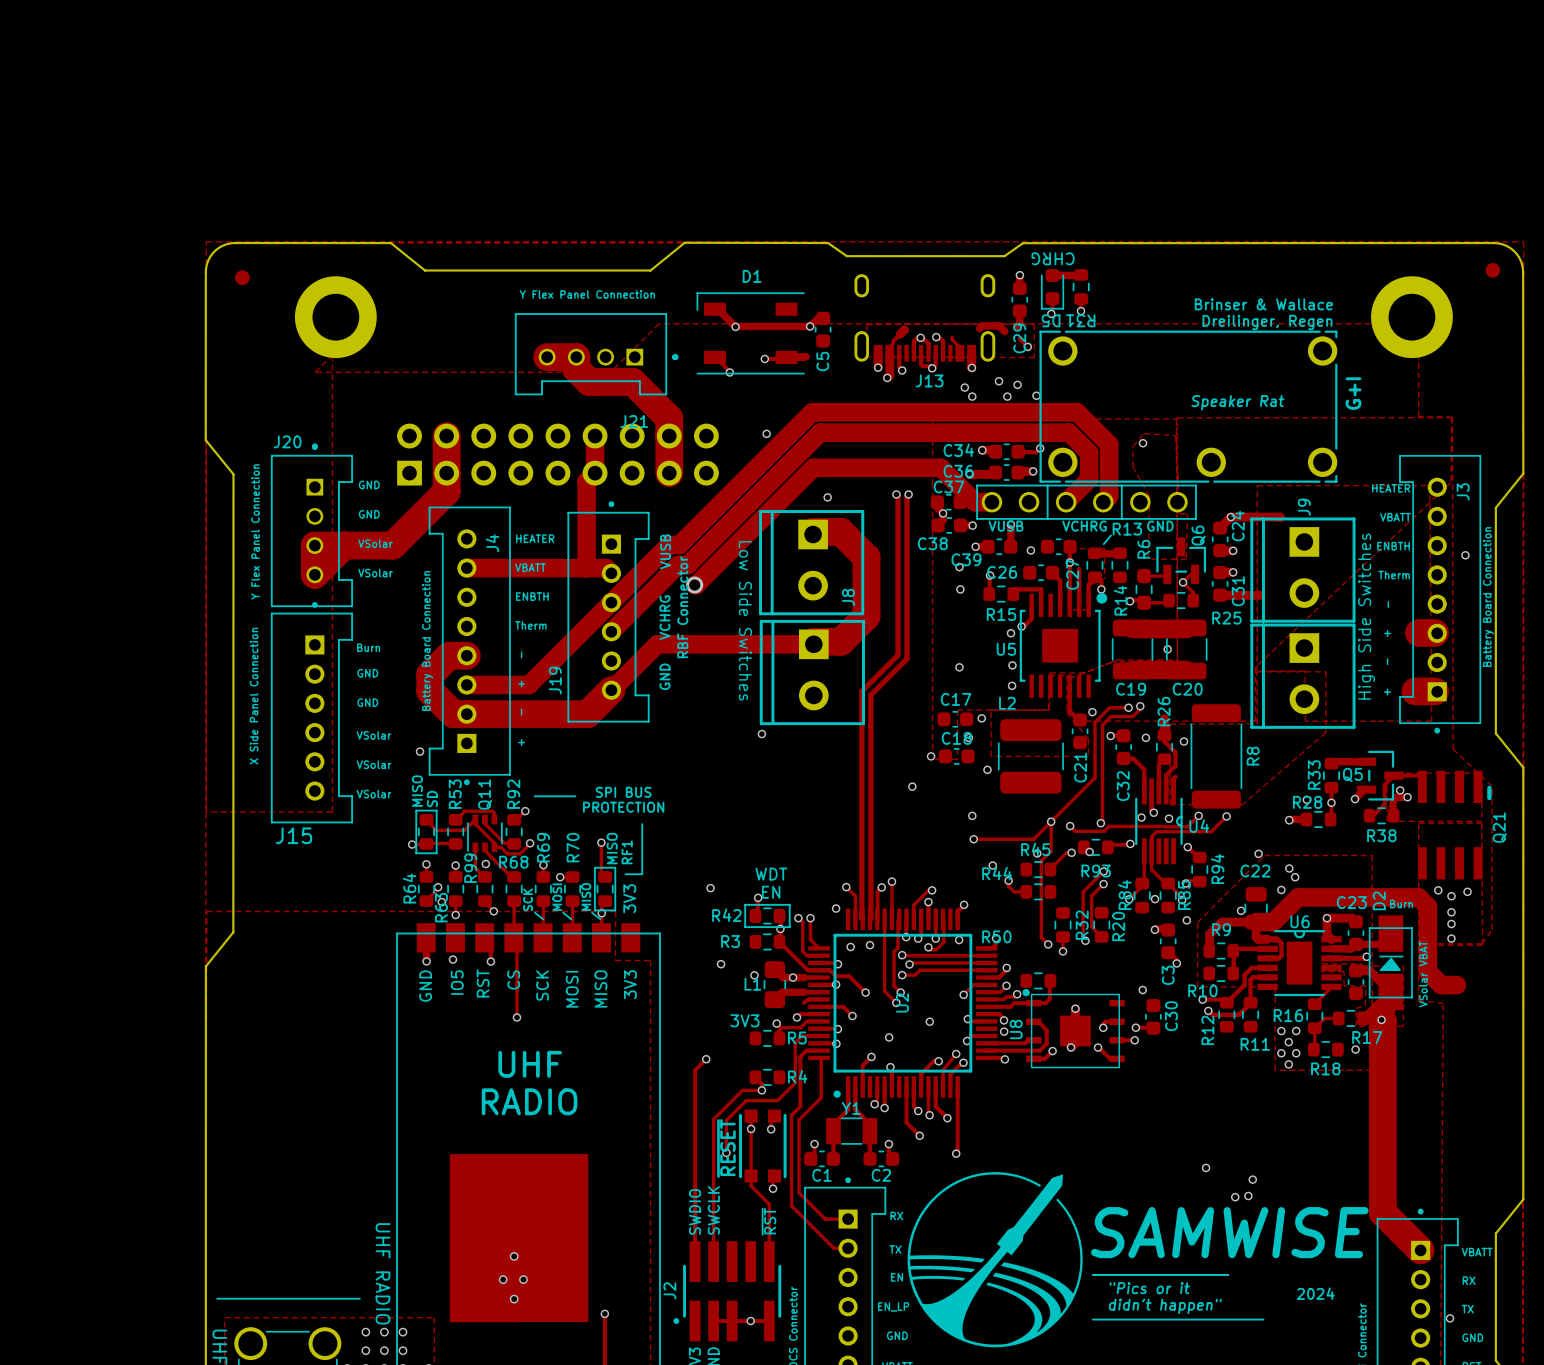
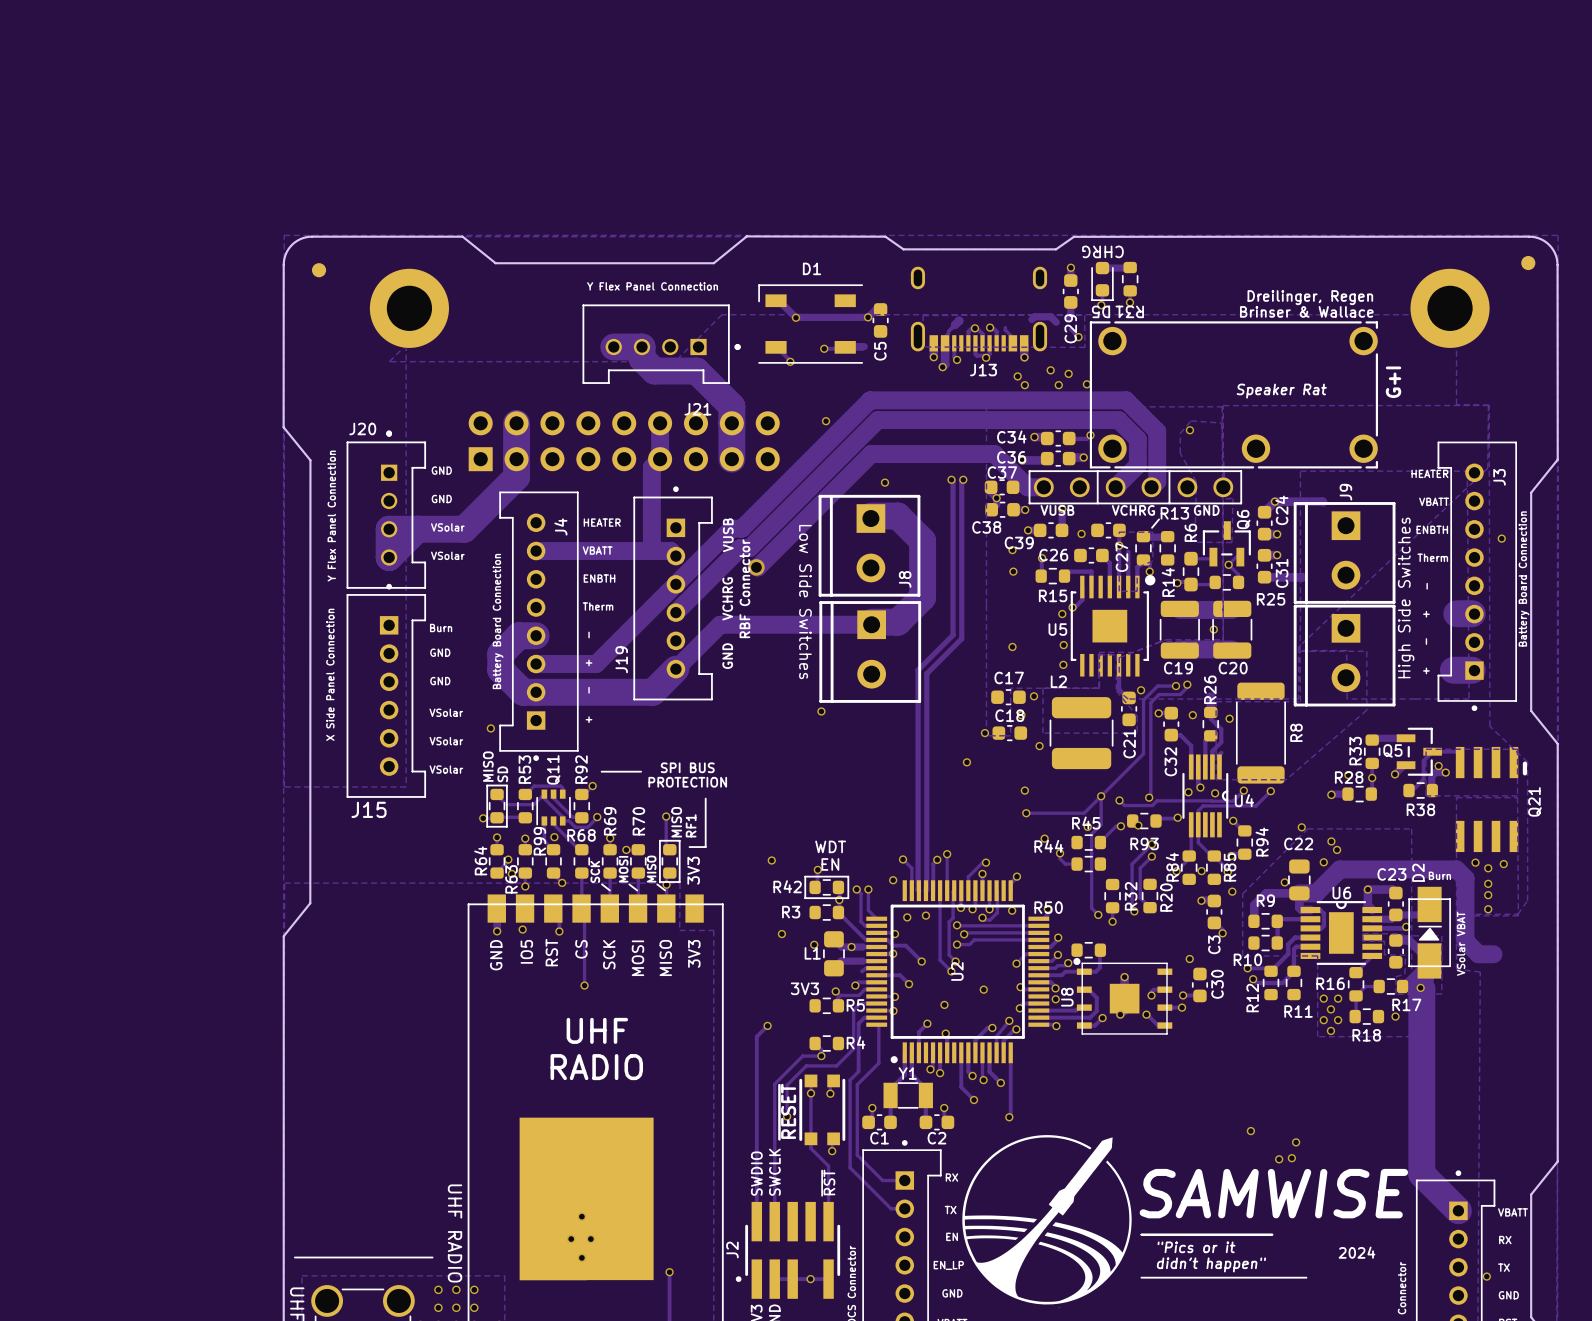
text: Brinser & Wallace (1263, 304) -> Dreilinger, Regen (1310, 297)
text: Dreilinger, Regen (1267, 322) -> Brinser & Wallace (1306, 311)

